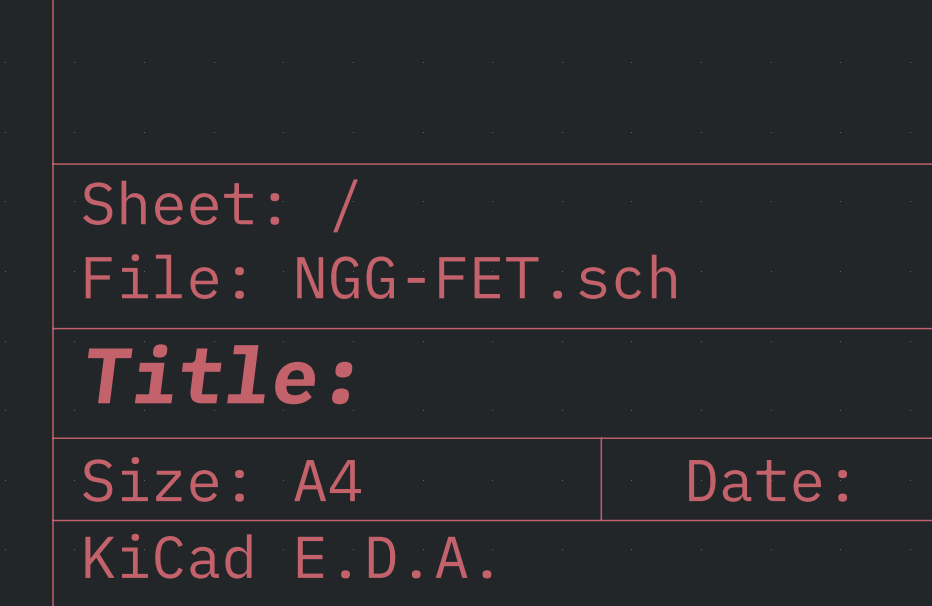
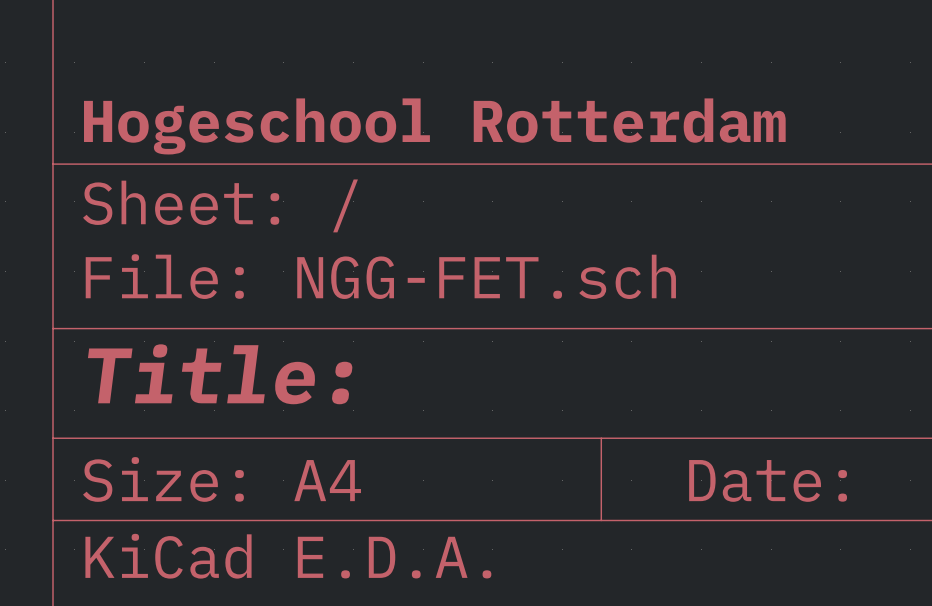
title block: none -> Hogeschool Rotterdam (434, 126)

